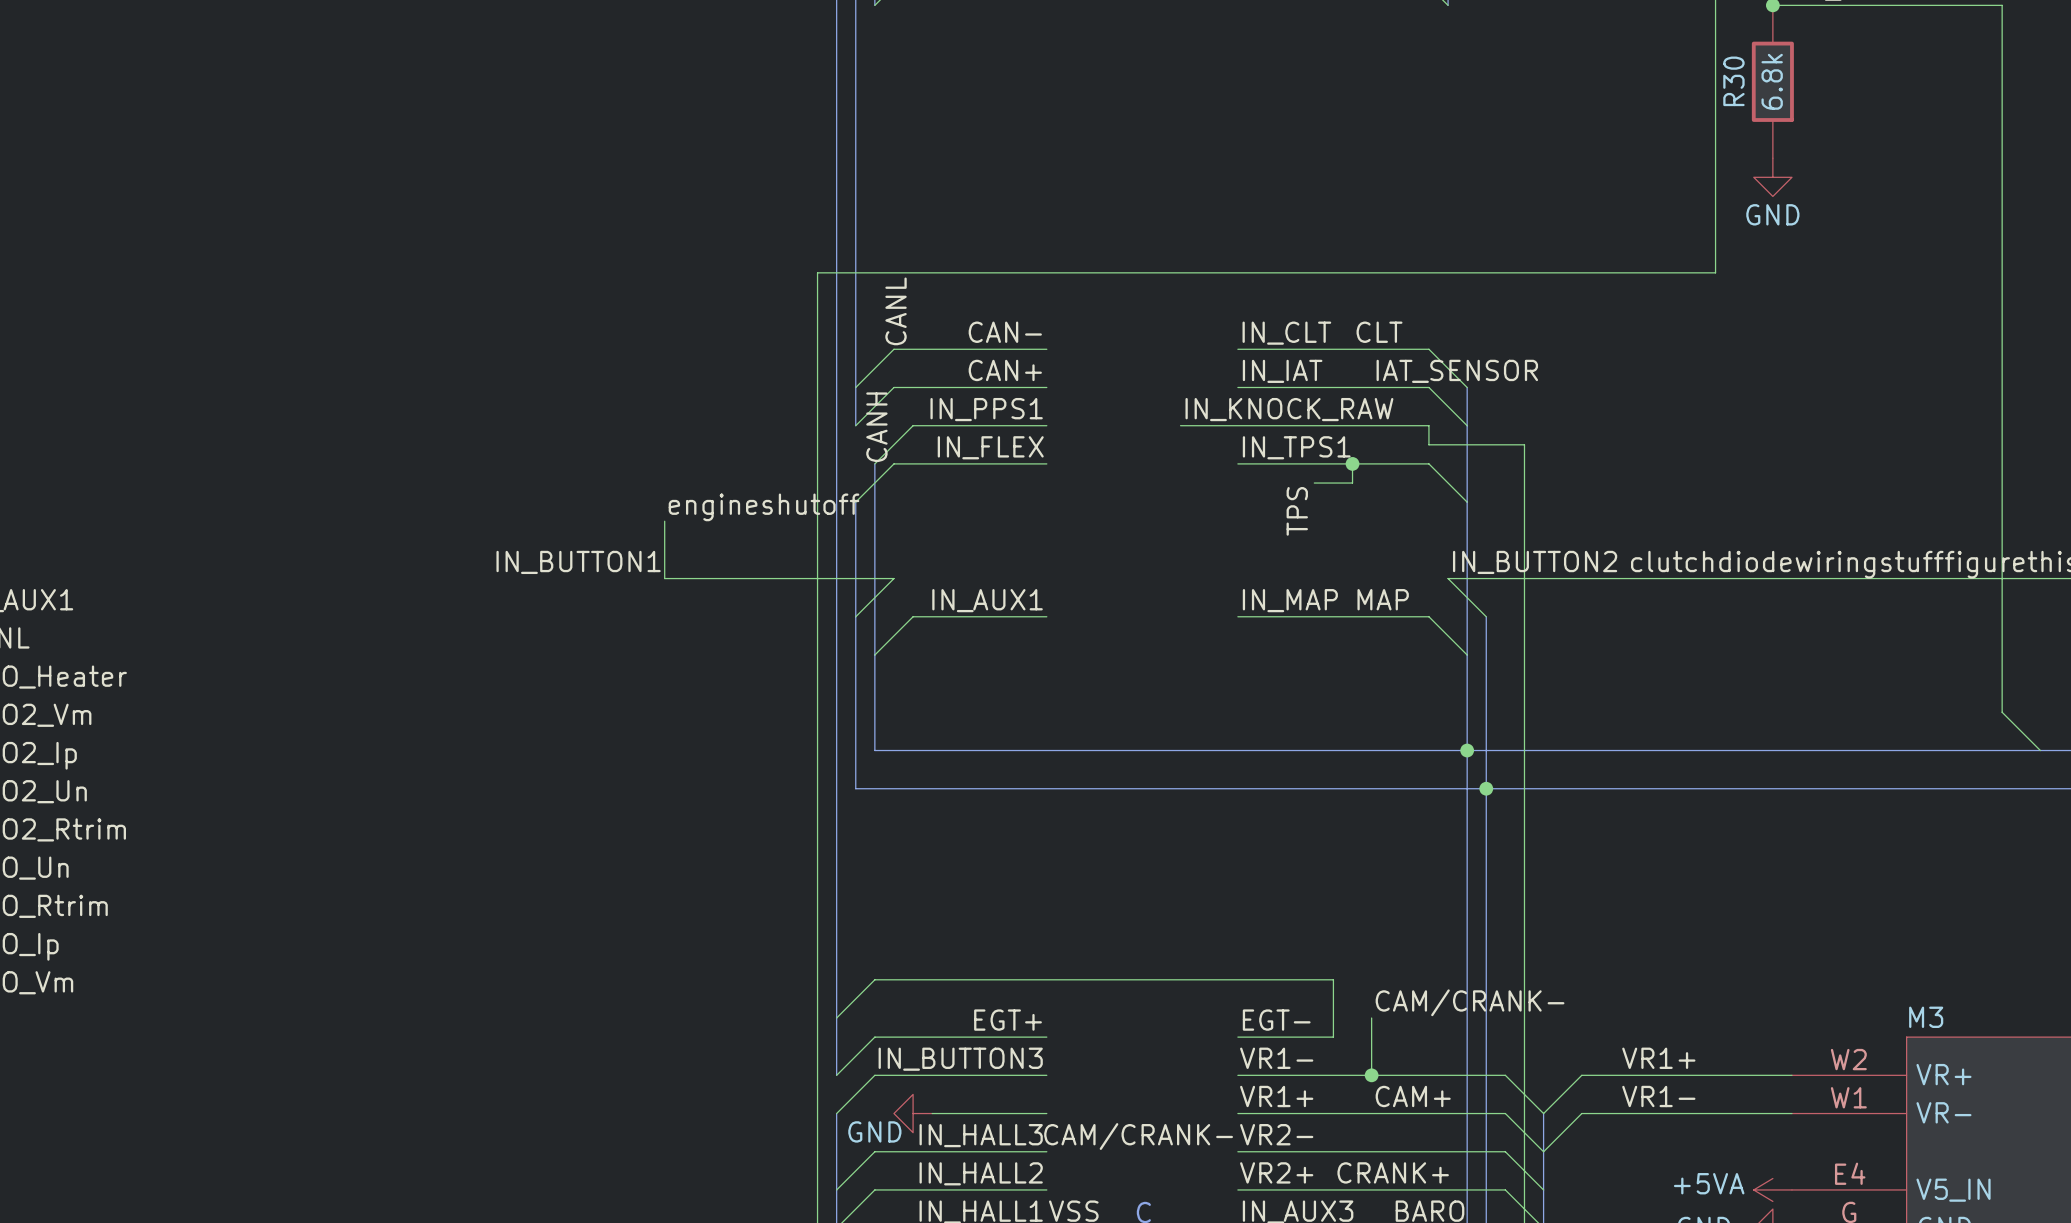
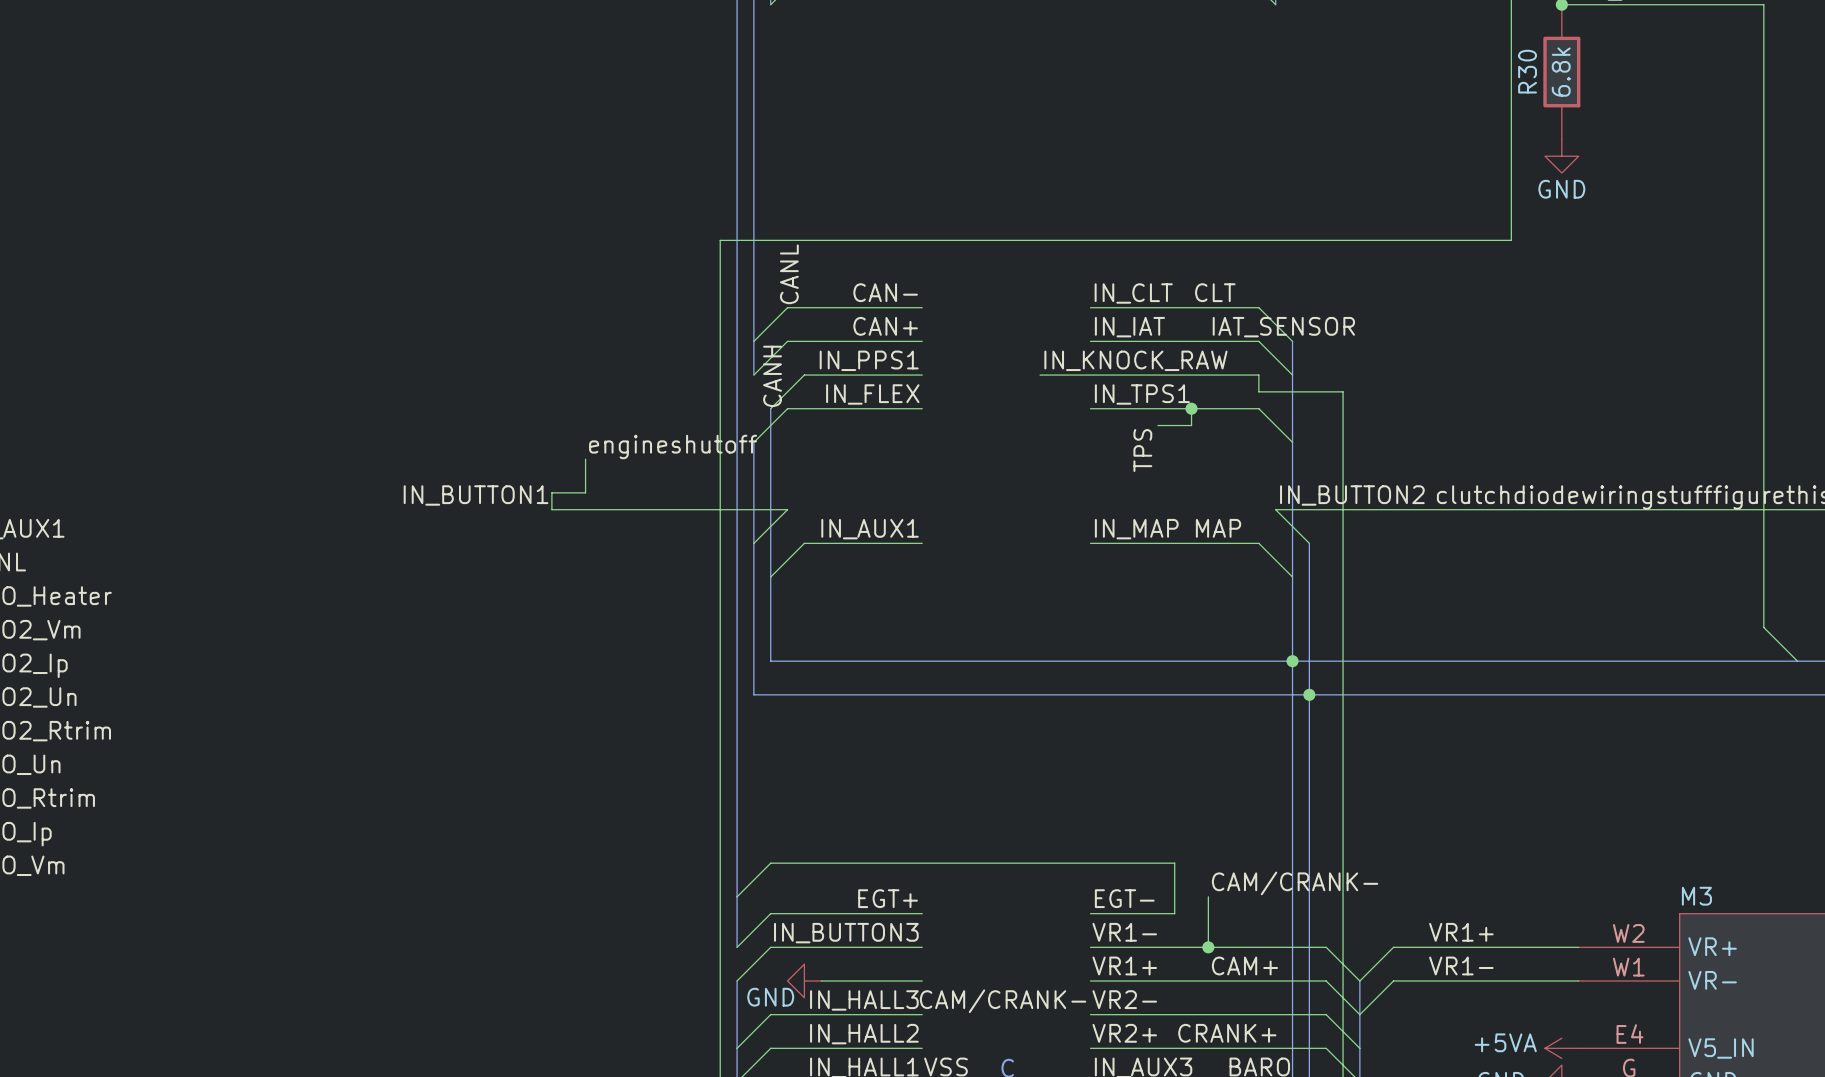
wire: (664, 559) (664, 578) -> (585, 492) (551, 492) (551, 509) (585, 509)
label position: IN_BUTTON1 (578, 562) -> IN_BUTTON1 (476, 495)

